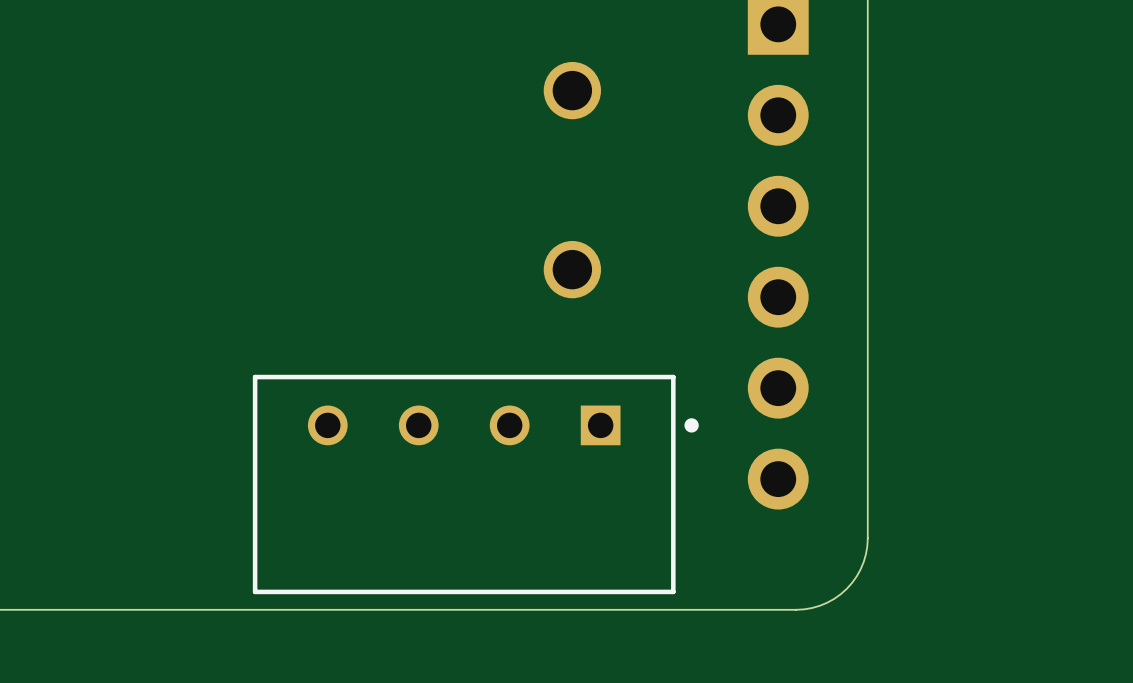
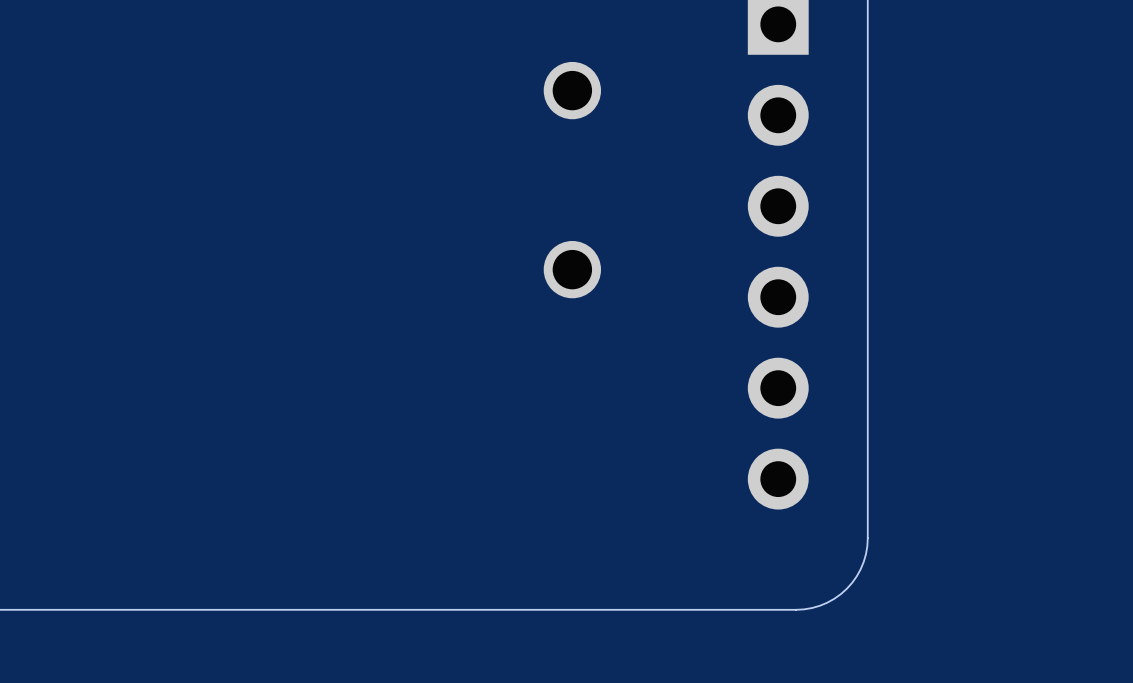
part: (475, 484) -> none

